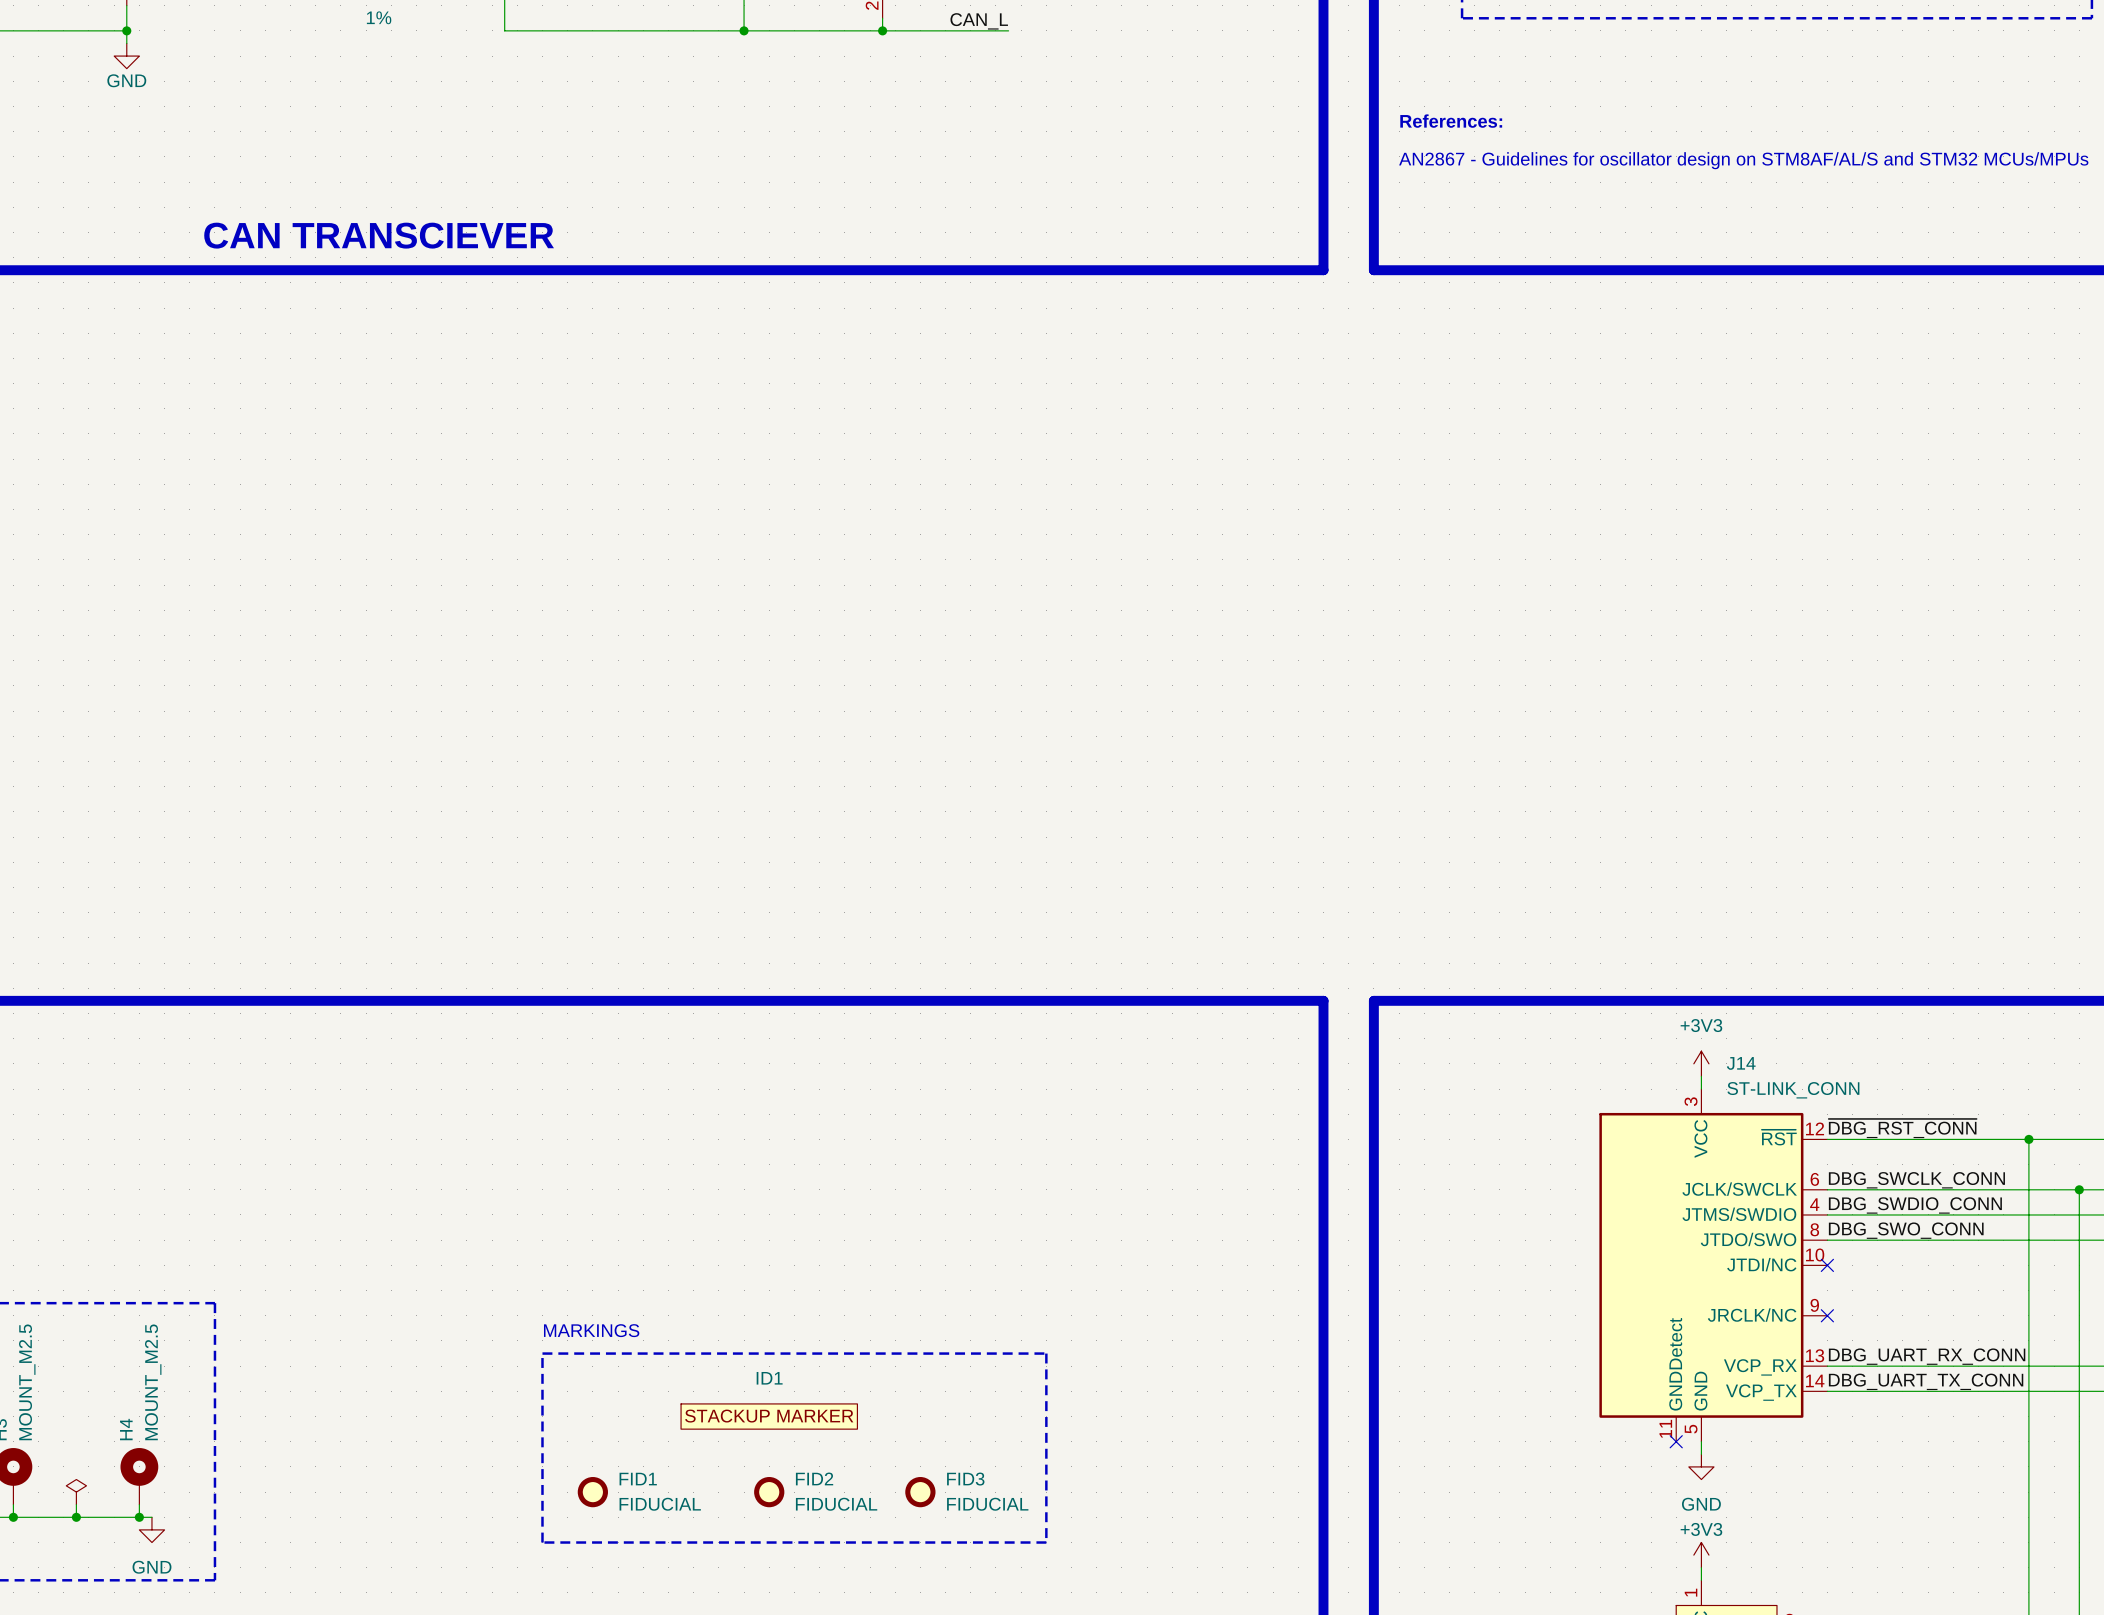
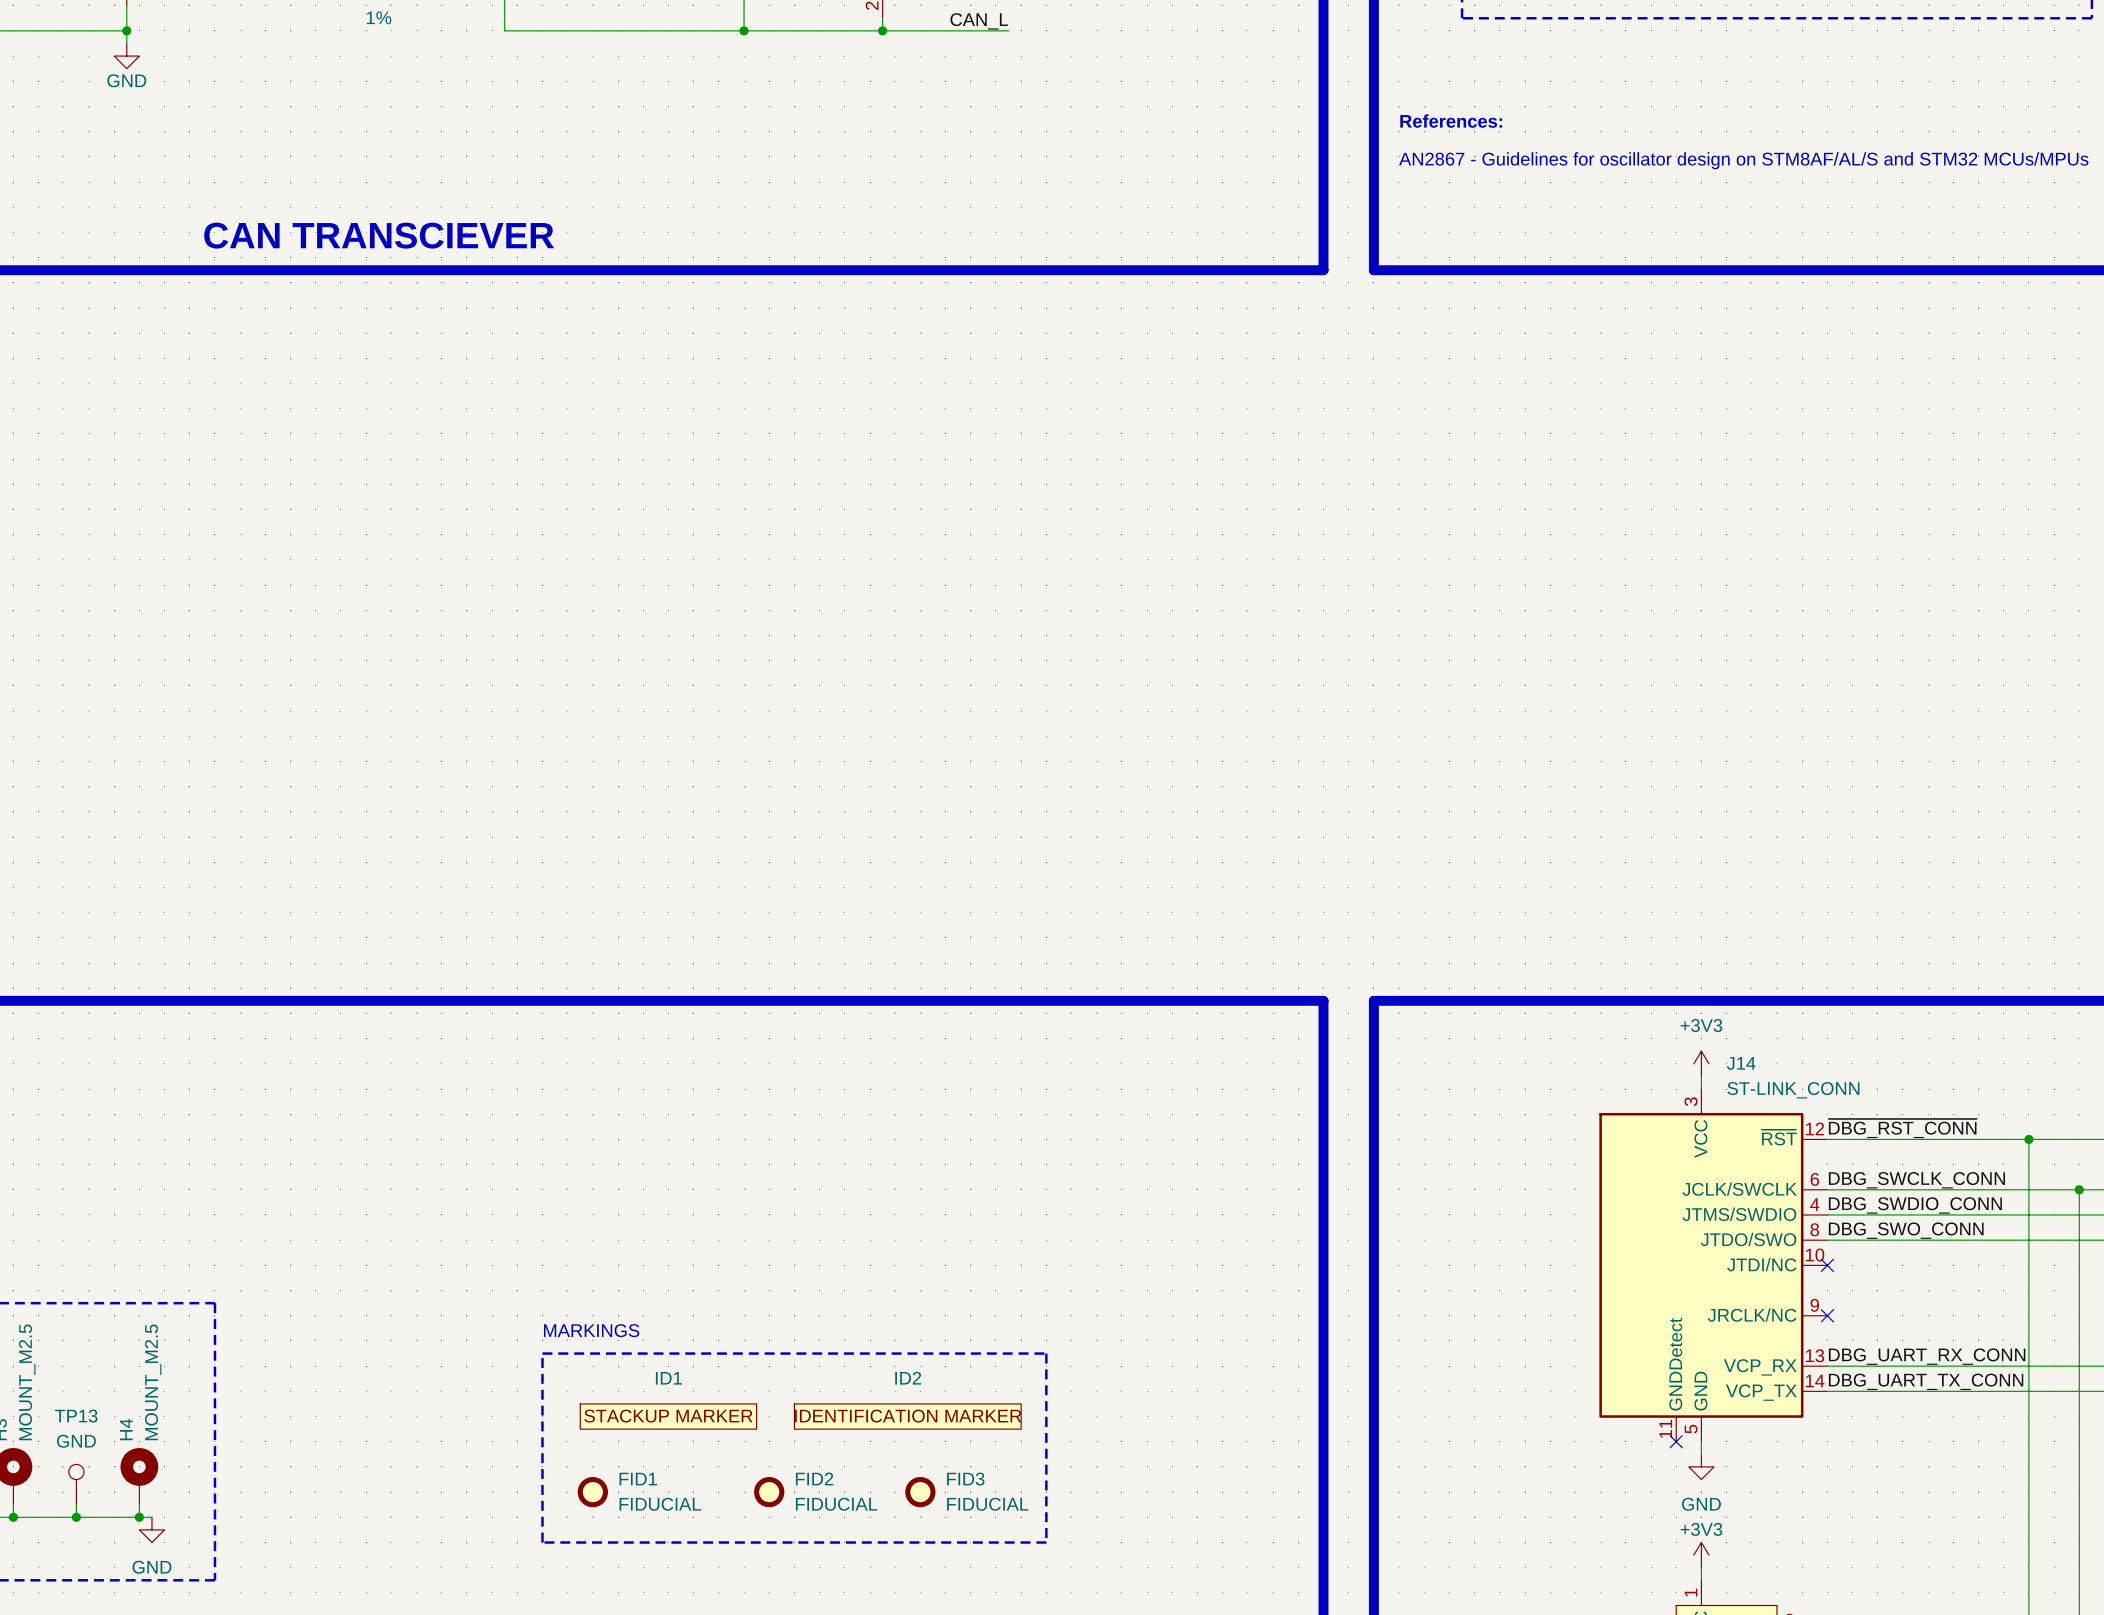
ID1 position: (769, 1416) -> (668, 1416)
ID2: none -> (907, 1416)
TP13: none -> GND (76, 1484)
power symbol: (76, 1492) -> none

